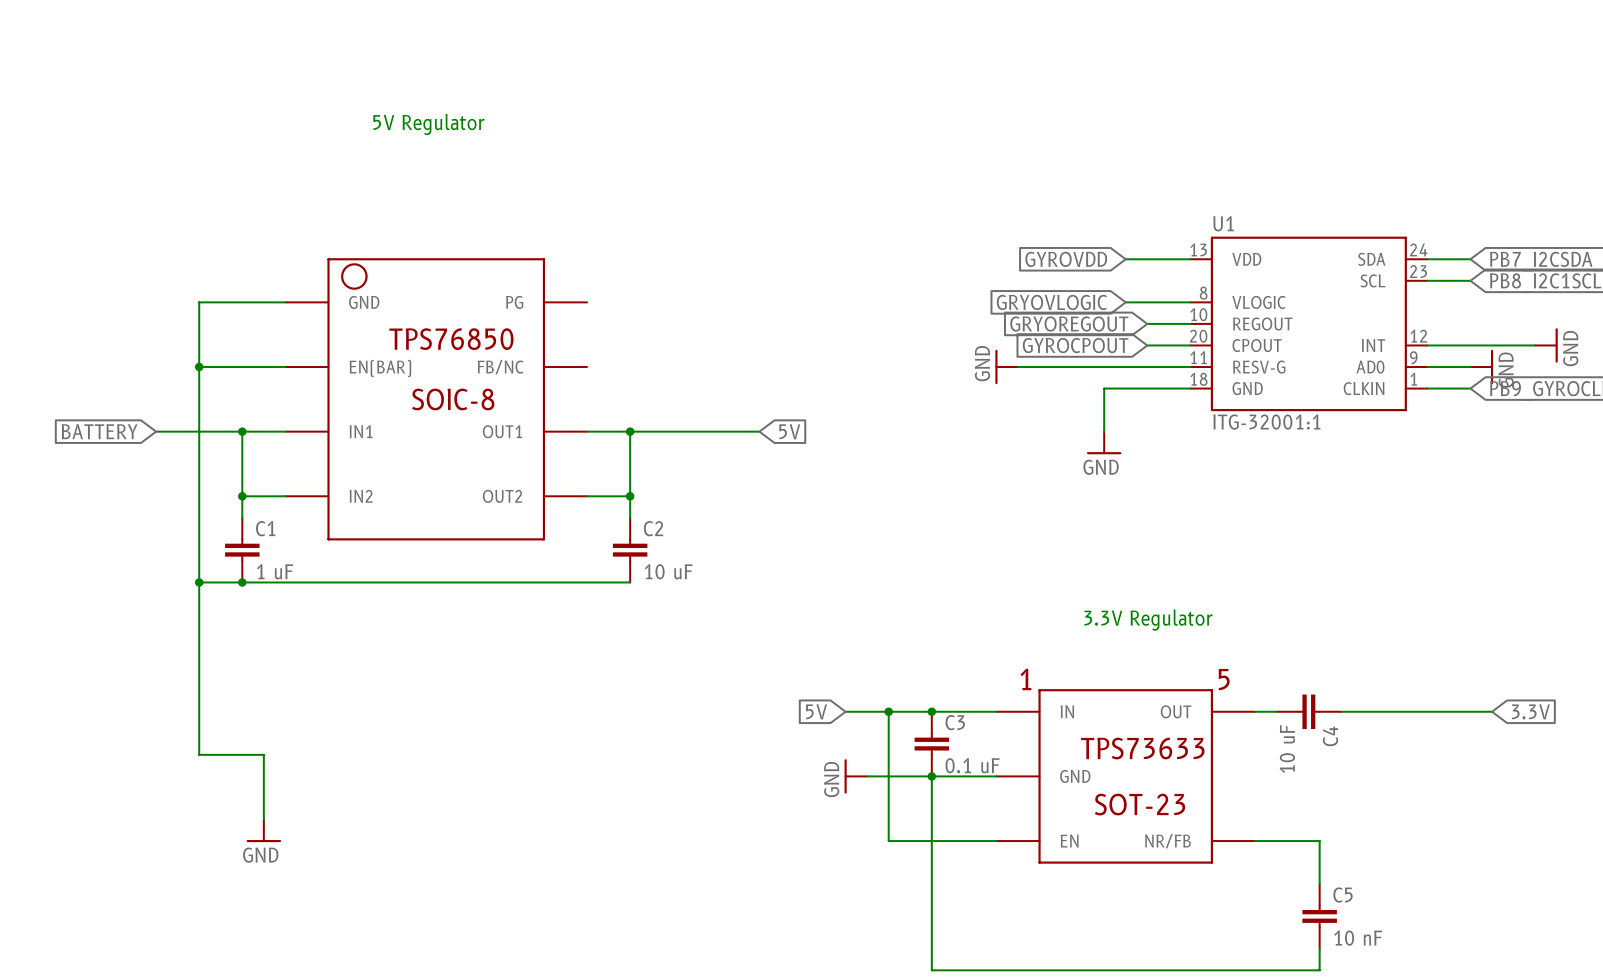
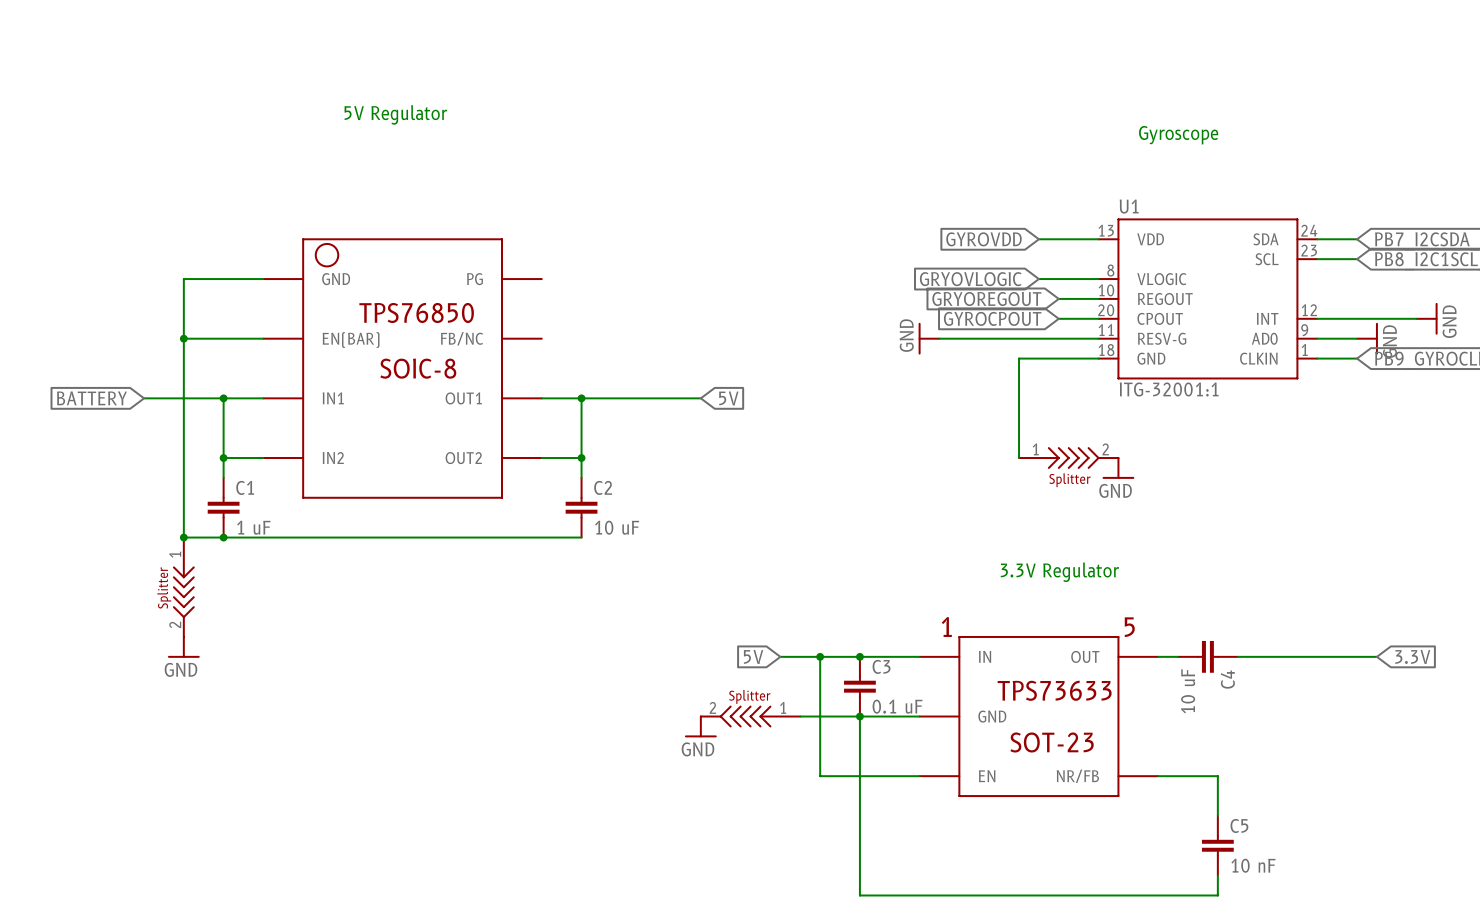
text: none -> Gyroscope (1178, 135)
wire: none -> (1019, 398) (1019, 458)
power symbol position: GND (1104, 442) -> GND (1118, 468)
part: none -> (1068, 458)
wire: (199, 582) (199, 754) (263, 754) (263, 819) -> none
part: none -> (183, 587)
part: none -> (750, 716)
power symbol rotation: 0° (845, 776) -> 90° counterclockwise (700, 736)
power symbol position: GND (855, 776) -> GND (700, 726)
power symbol position: GND (263, 830) -> GND (183, 647)

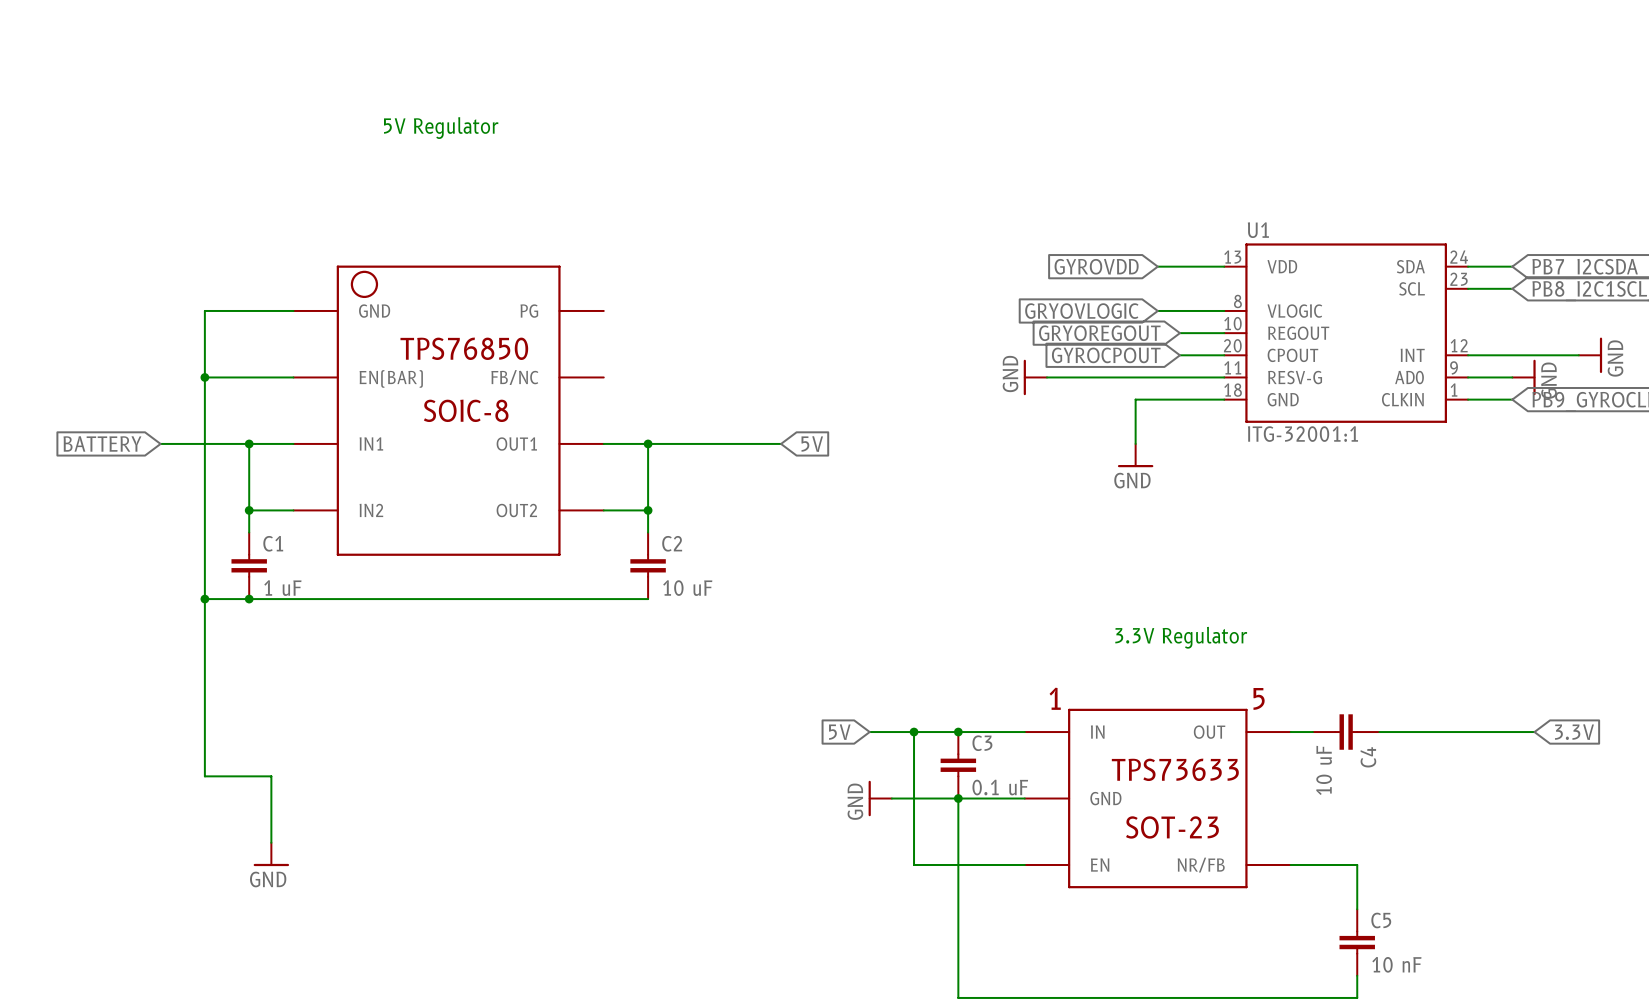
text: Gyroscope (1178, 135) -> none
wire: (1019, 398) (1019, 458) -> none
part: (1068, 458) -> none
power symbol position: GND (1118, 468) -> GND (1135, 455)
wire: none -> (204, 599) (204, 776) (271, 776) (271, 842)
part: (183, 587) -> none
power symbol position: GND (183, 647) -> GND (271, 854)
part: (750, 716) -> none
power symbol position: GND (700, 726) -> GND (880, 798)
power symbol rotation: 0° (700, 736) -> 90° clockwise (869, 798)

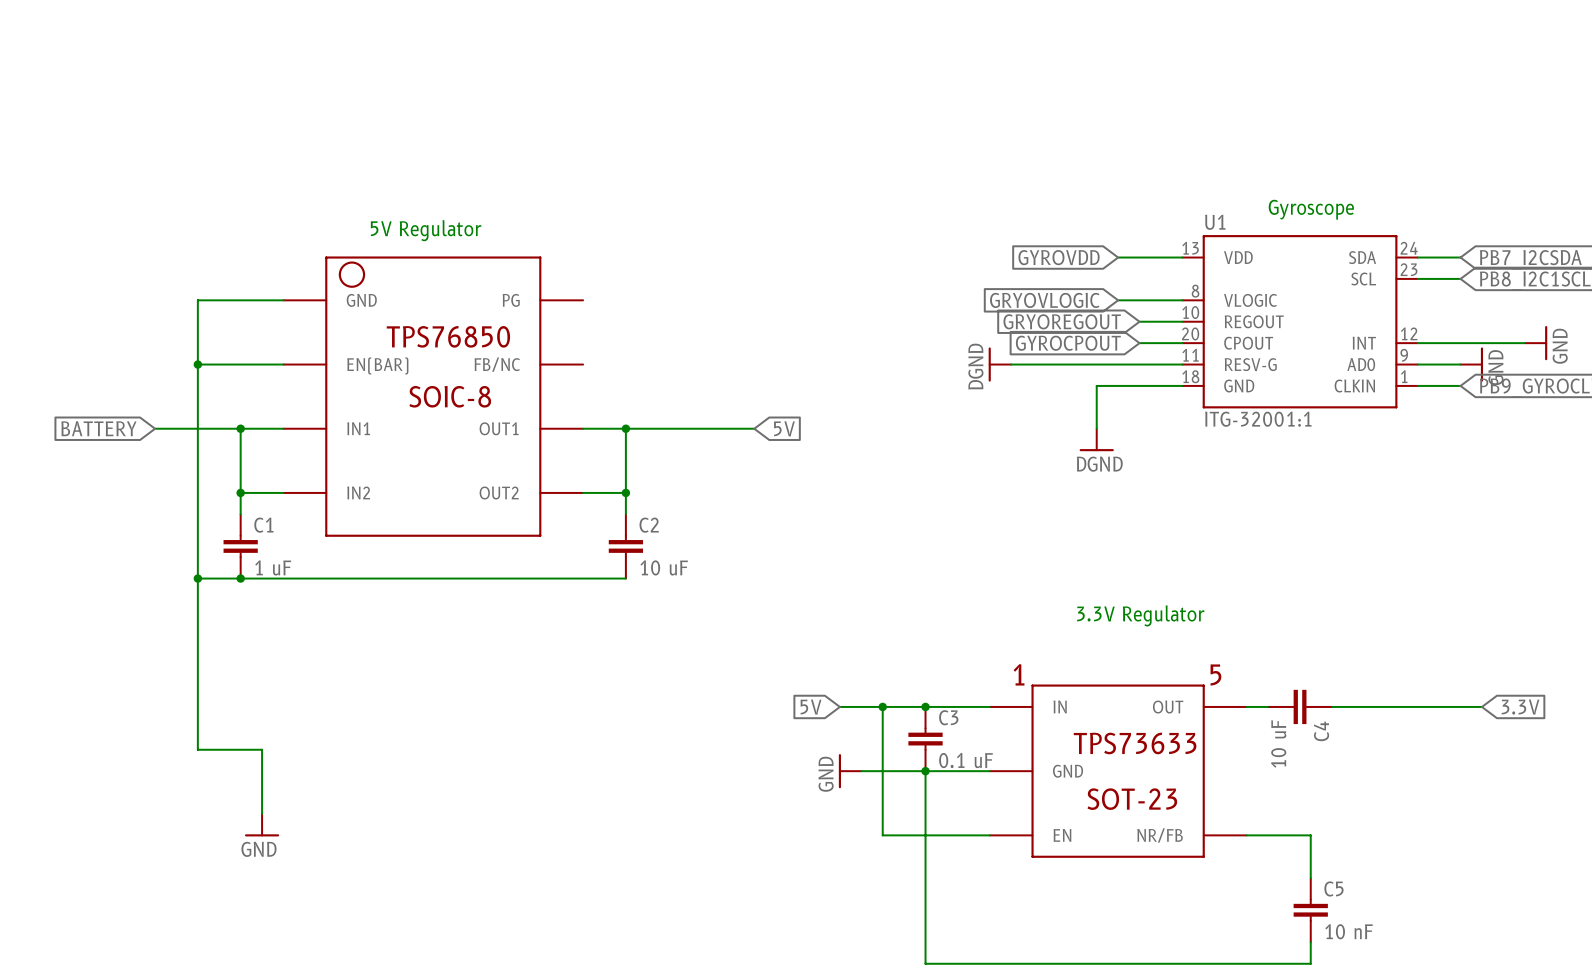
text position: 5V Regulator (441, 128) -> 5V Regulator (426, 230)
text: none -> Gyroscope (1311, 209)
power symbol: GND (1035, 377) -> DGND (999, 364)
power symbol: GND (1135, 455) -> DGND (1096, 439)

